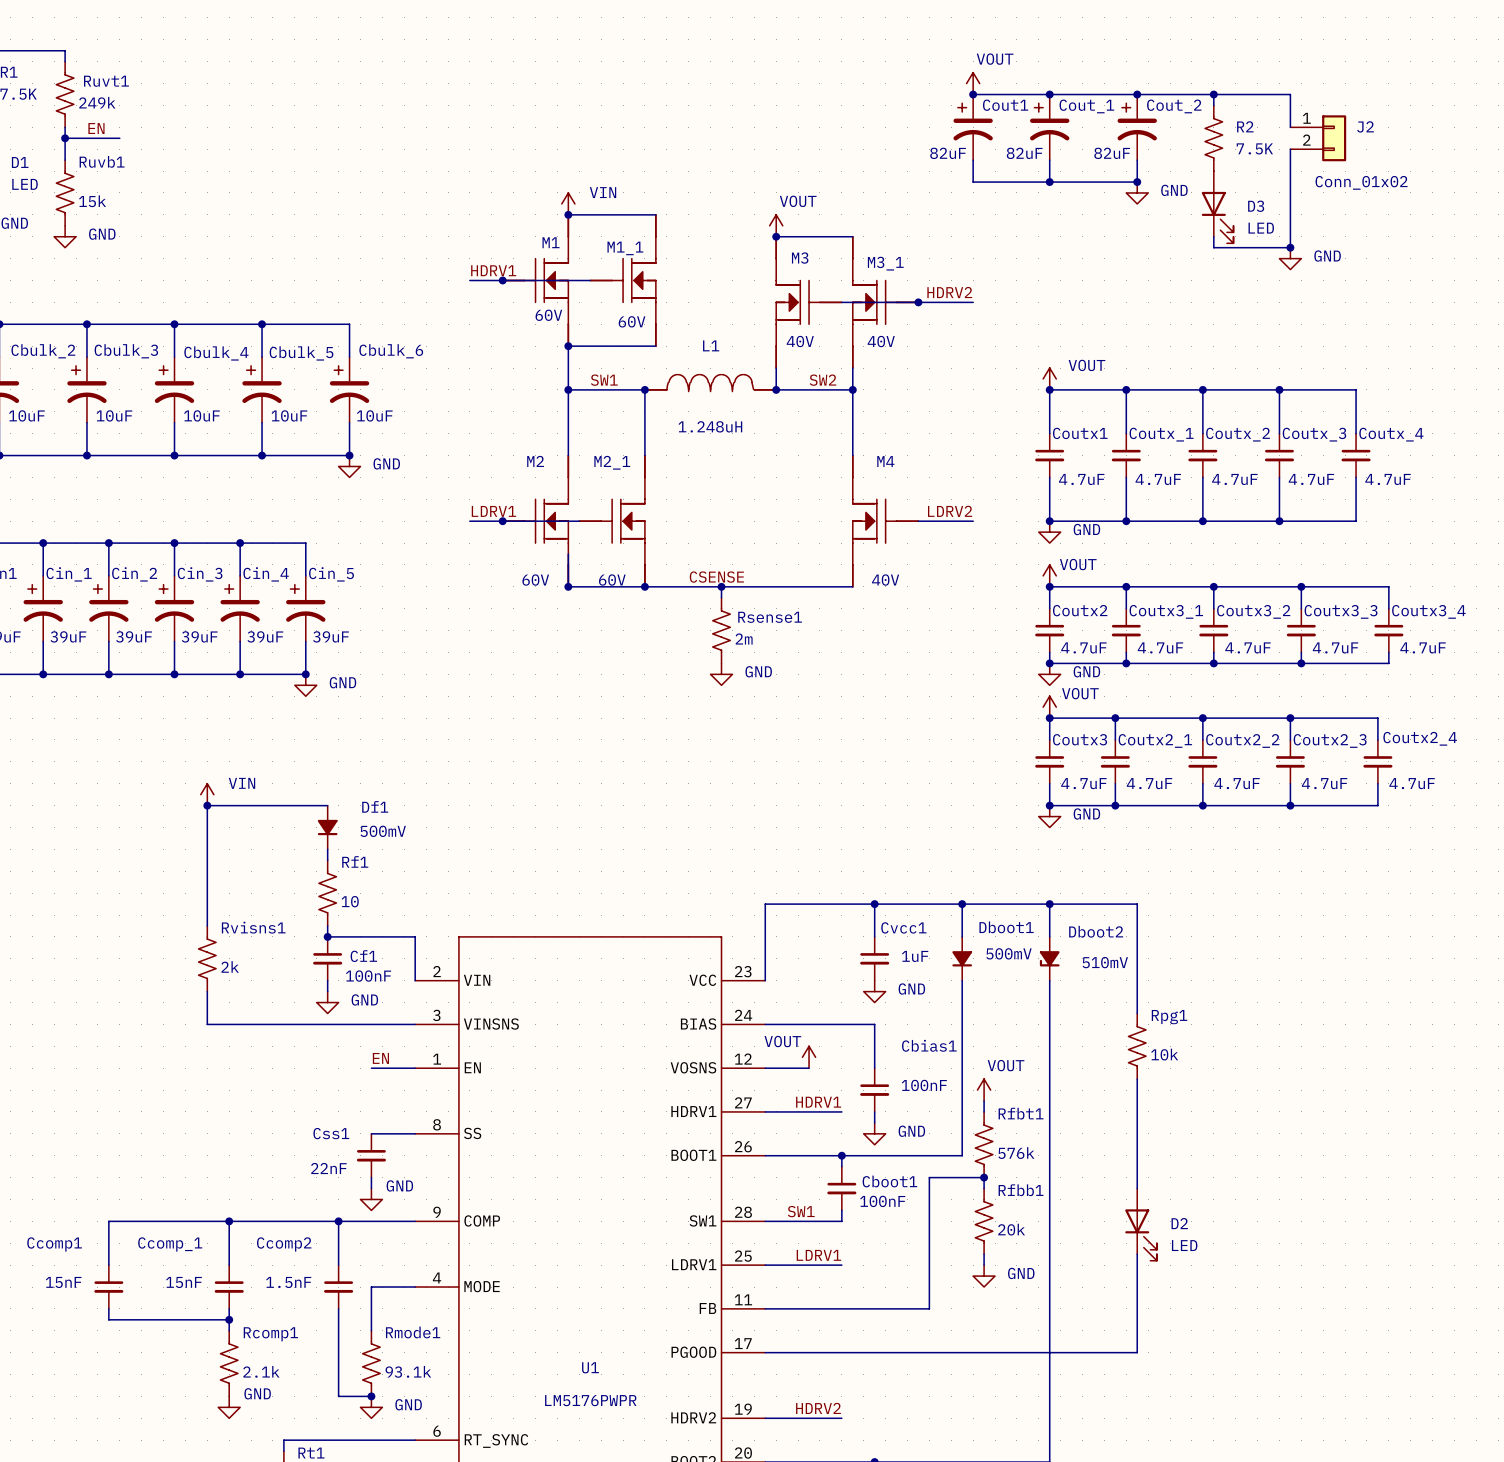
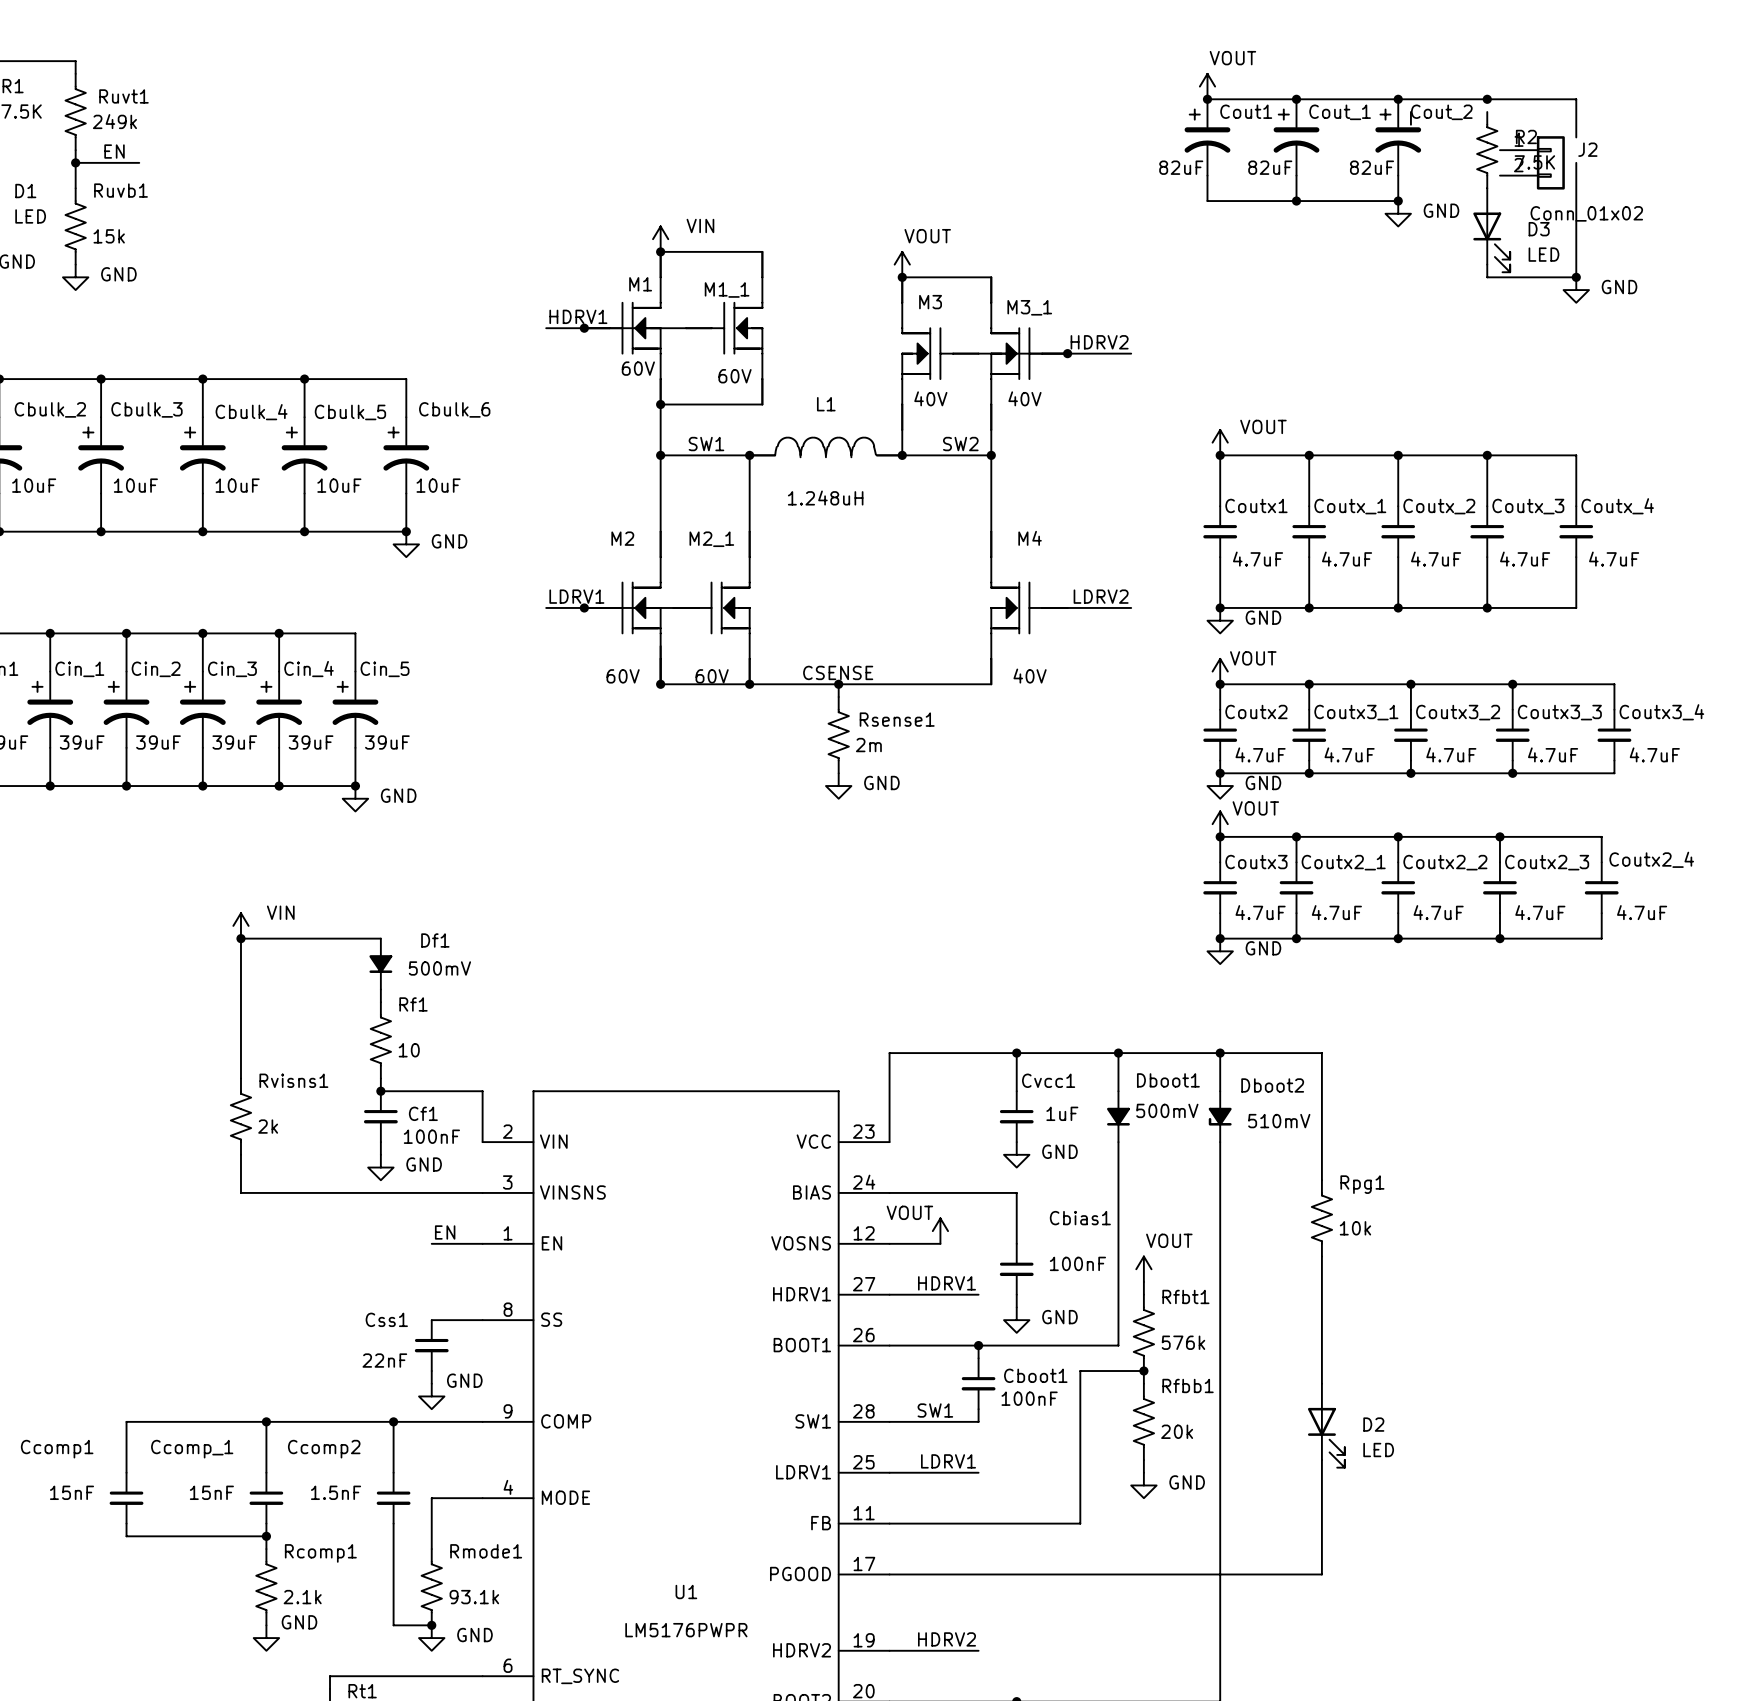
power symbol position: VOUT (973, 83) -> VOUT (1207, 86)
junction: none -> (1487, 99)
wire: (973, 94) (1290, 94) (1290, 127) -> (1207, 99) (1576, 99) (1576, 137)
junction: (973, 94) -> none
junction position: (1049, 94) -> (1207, 99)
junction position: (1137, 94) -> (1296, 99)
junction position: (1213, 94) -> (1398, 99)
Cout1 position: (973, 127) -> (1207, 137)
Cout_1 position: (1049, 127) -> (1296, 137)
Cout_2 position: (1137, 127) -> (1398, 137)
R2 position: (1213, 138) -> (1487, 150)
wire: (1290, 149) (1290, 247) (1213, 247) (1213, 236) -> (1576, 162) (1576, 277) (1487, 277) (1487, 264)
wire: (973, 160) (973, 182) (1137, 182) (1137, 160) -> (1207, 175) (1207, 201) (1398, 201) (1398, 175)
wire: (1049, 160) (1049, 182) -> (1296, 175) (1296, 201)
junction: none -> (1398, 201)
junction: (1049, 182) -> none
junction position: (1137, 182) -> (1296, 201)
power symbol: none -> GND (1398, 213)
power symbol: GND (1137, 192) -> none
D3 position: (1217, 207) -> (1491, 230)
junction: none -> (1576, 277)
junction: (1290, 247) -> none
power symbol: none -> GND (1576, 290)
power symbol: GND (1290, 258) -> none

